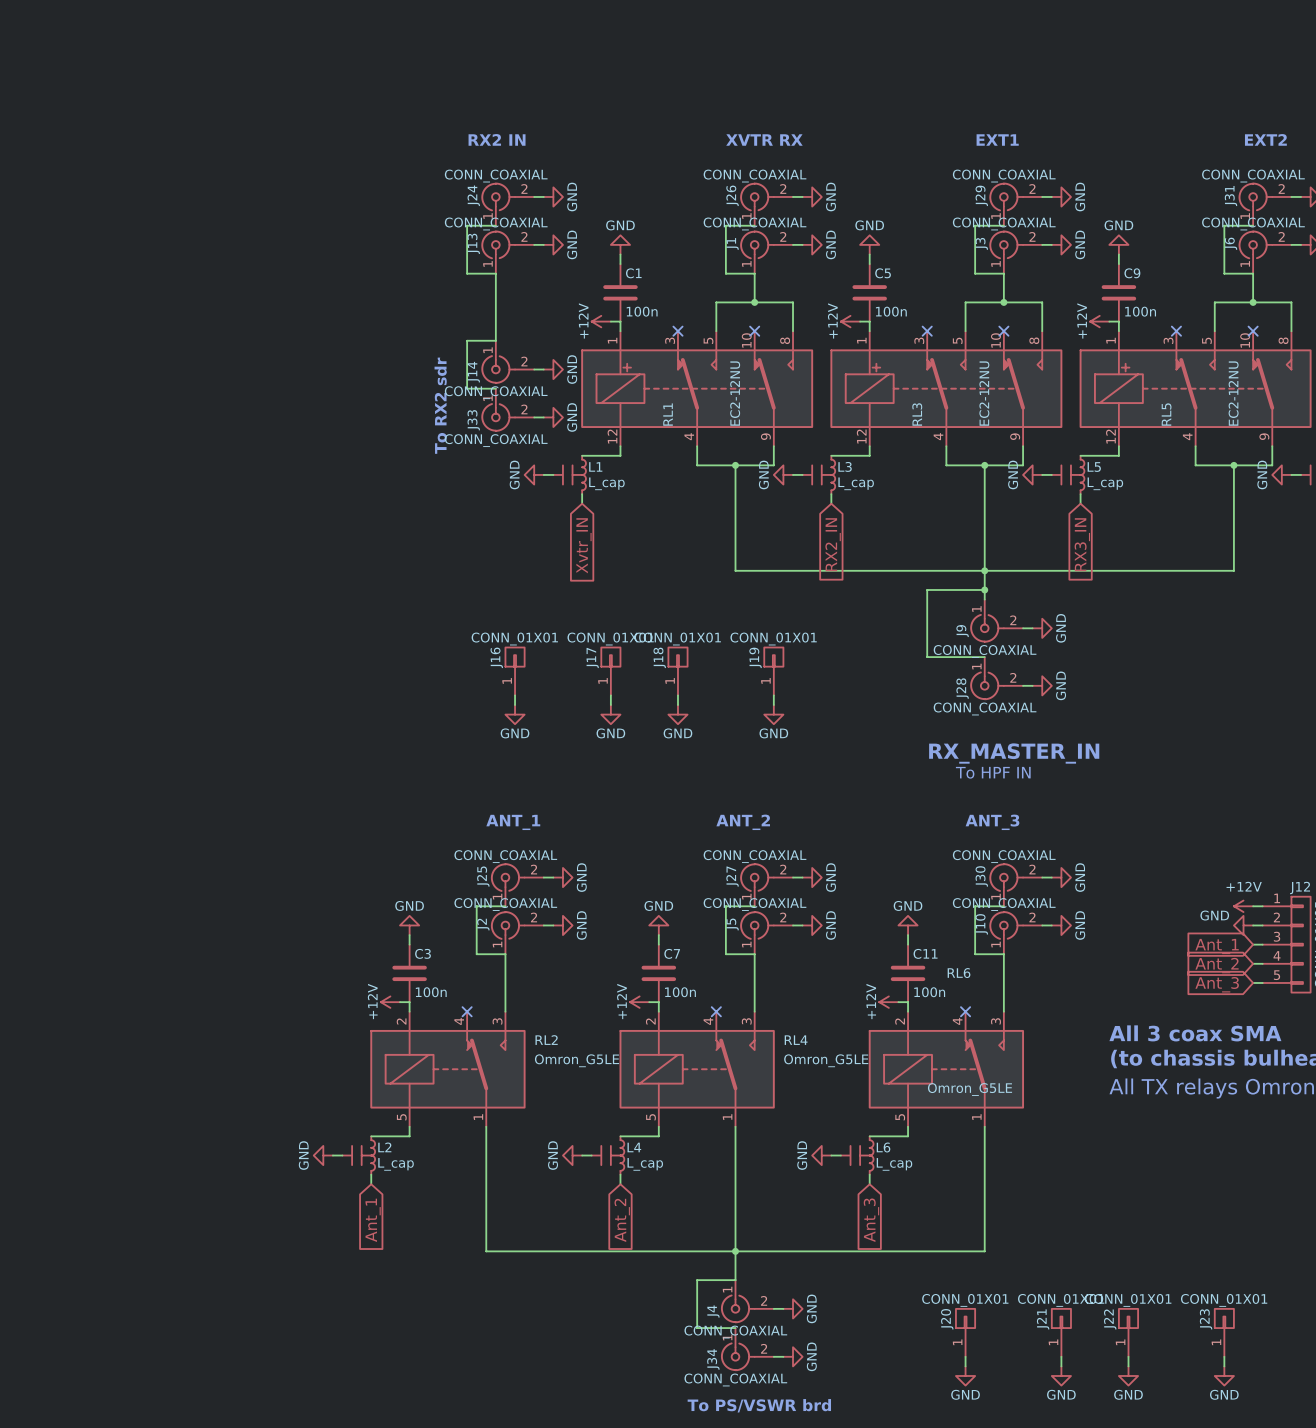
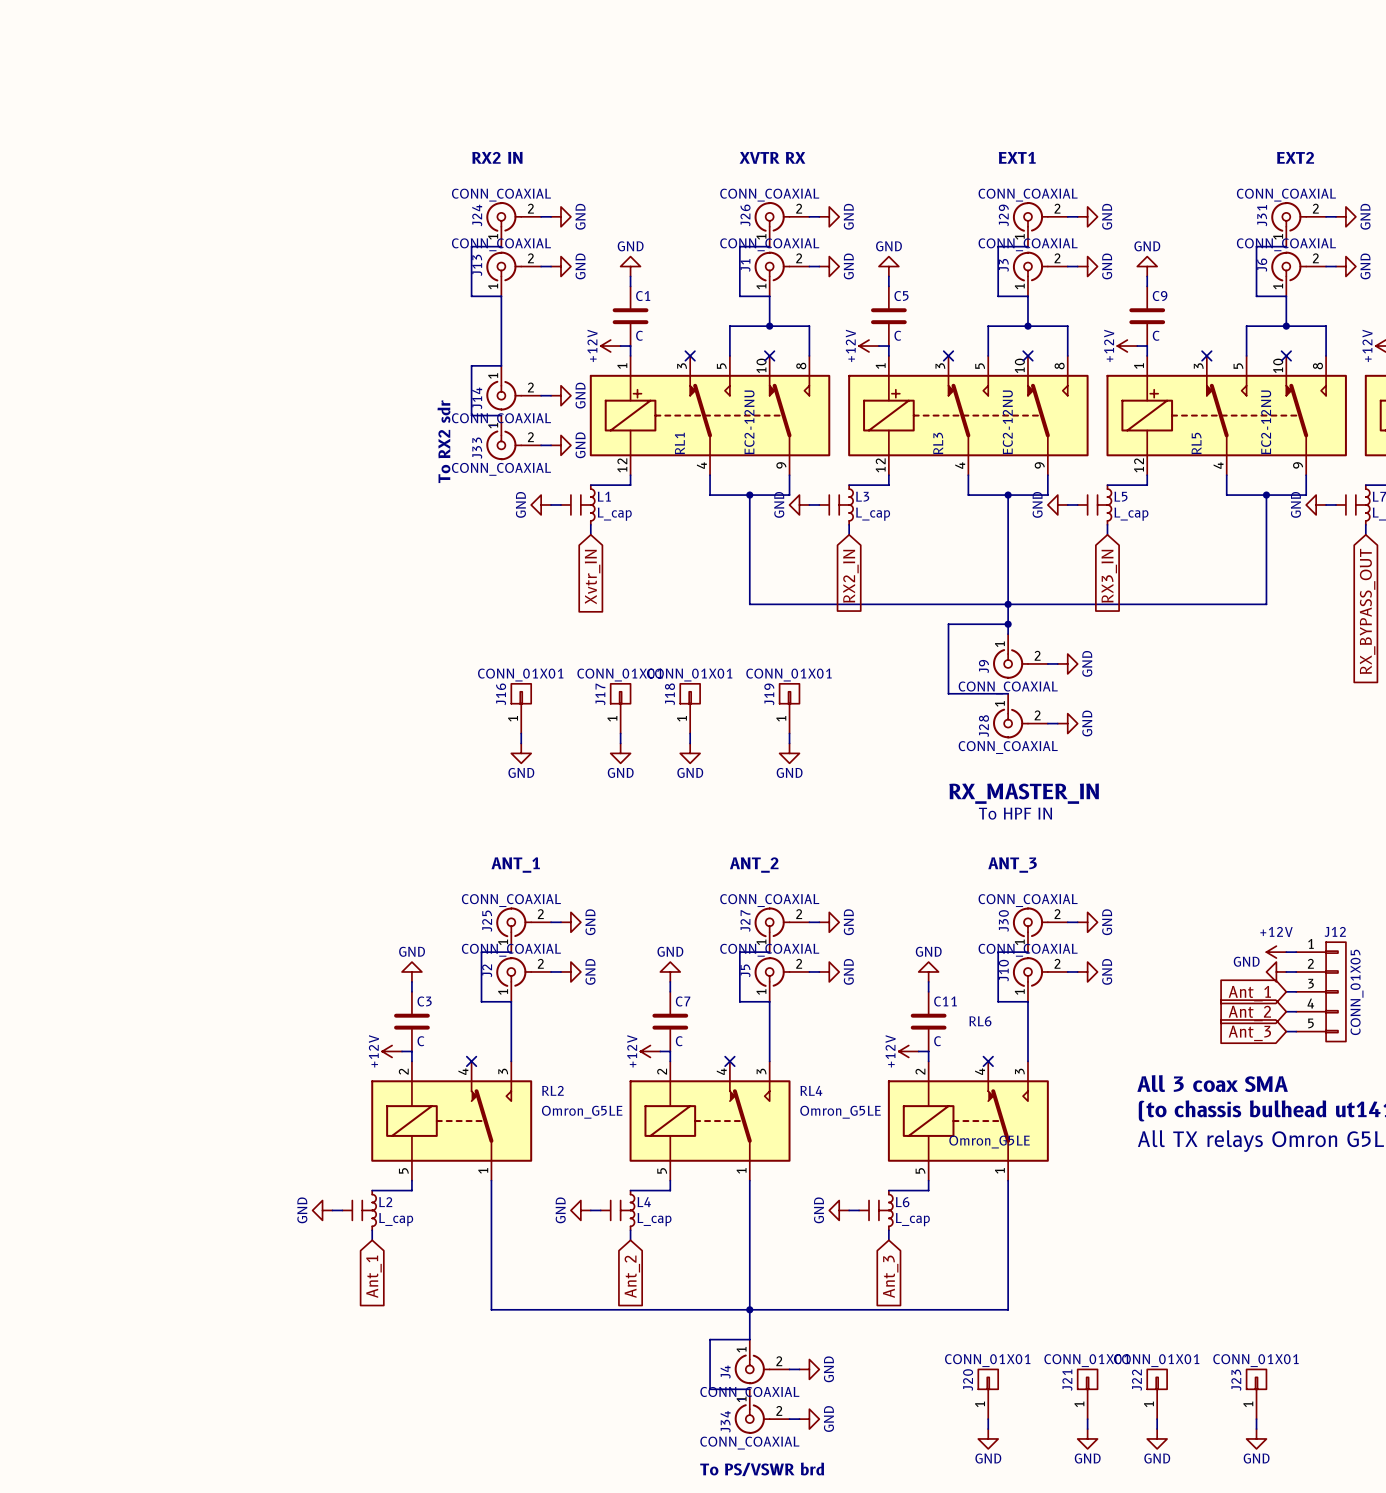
C1 value: 100n (642, 311) -> C (639, 335)
C5 value: 100n (891, 311) -> C (897, 335)
C9 value: 100n (1140, 311) -> C (1156, 335)
C3 value: 100n (431, 992) -> C (420, 1041)
C7 value: 100n (680, 992) -> C (679, 1041)
C11 value: 100n (929, 992) -> C (937, 1041)

